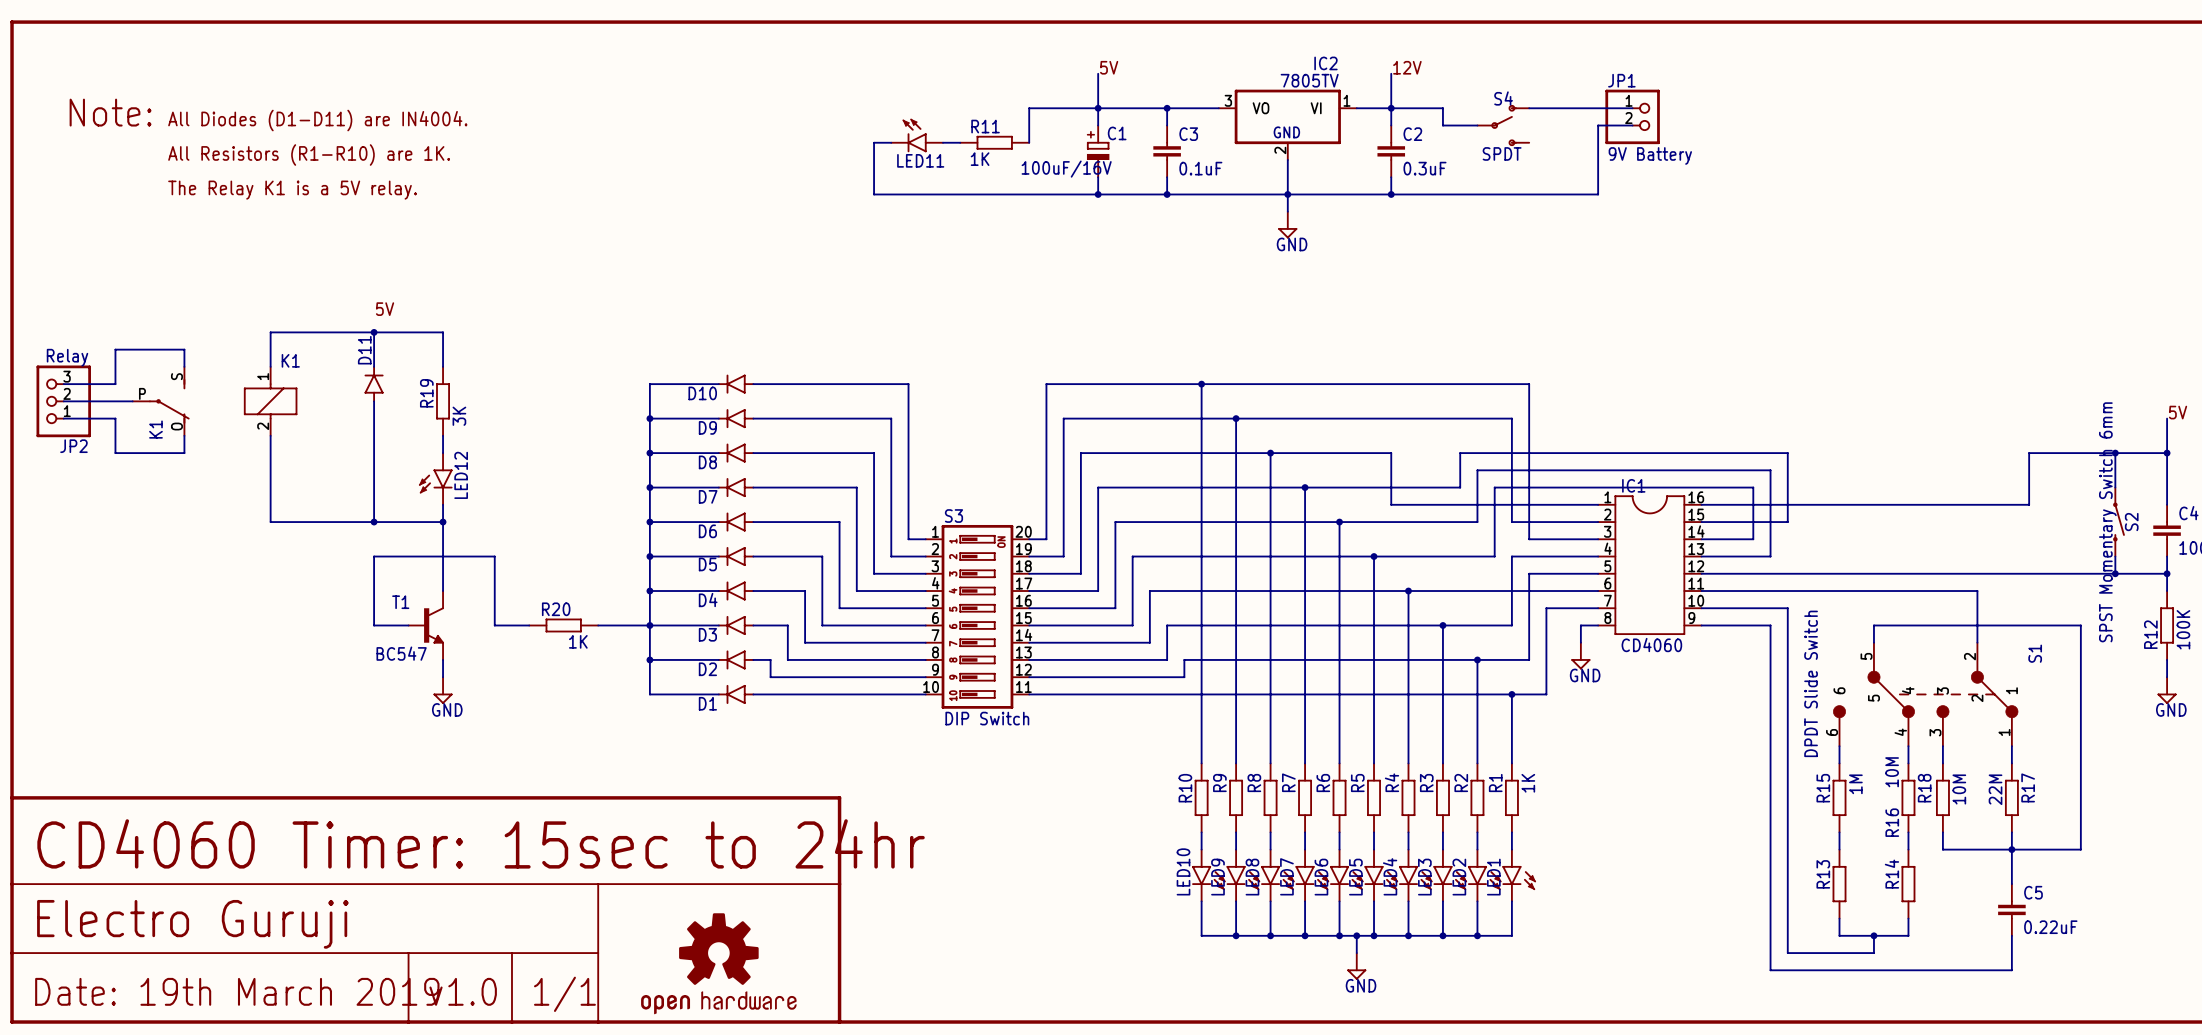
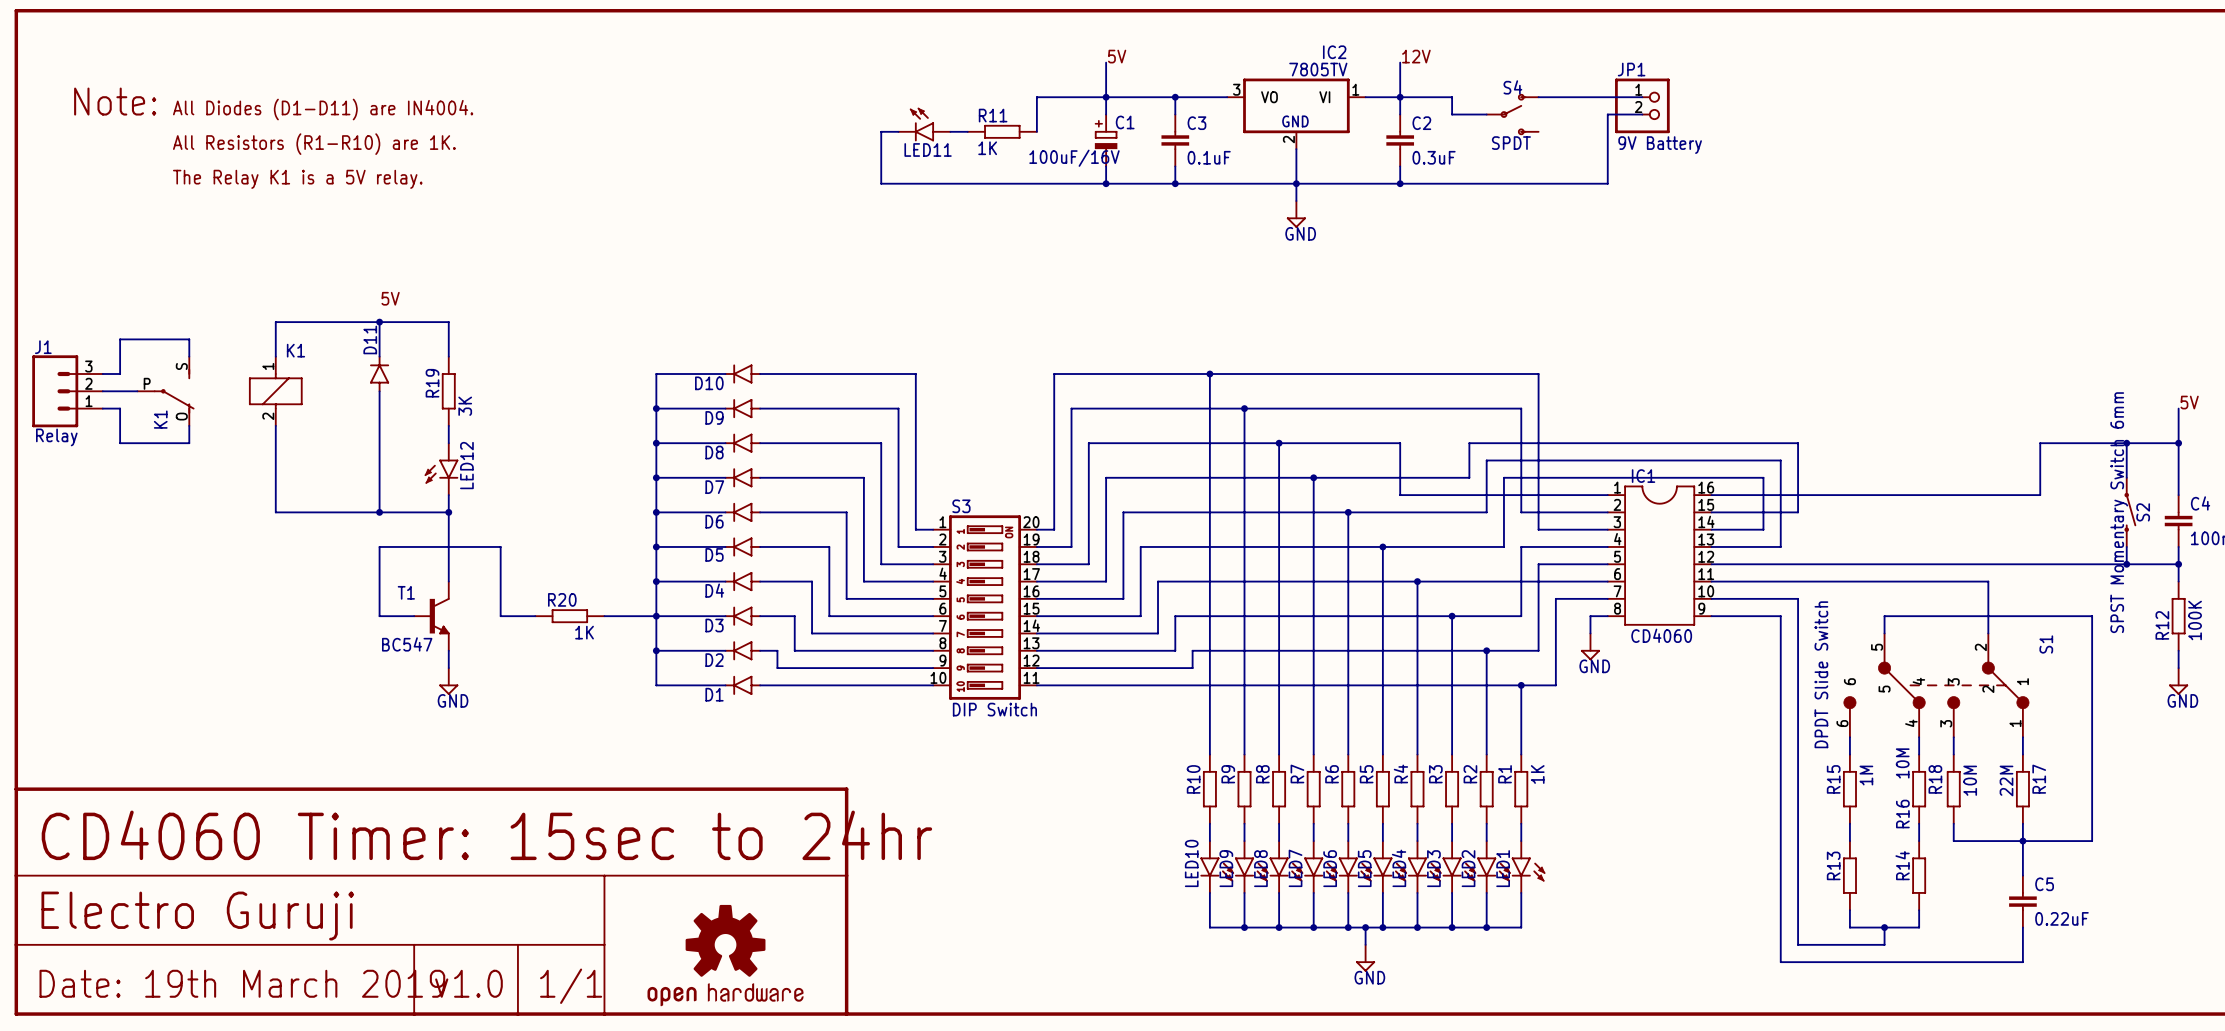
JP2: Relay (63, 401) -> none
J1: none -> Relay (67, 391)

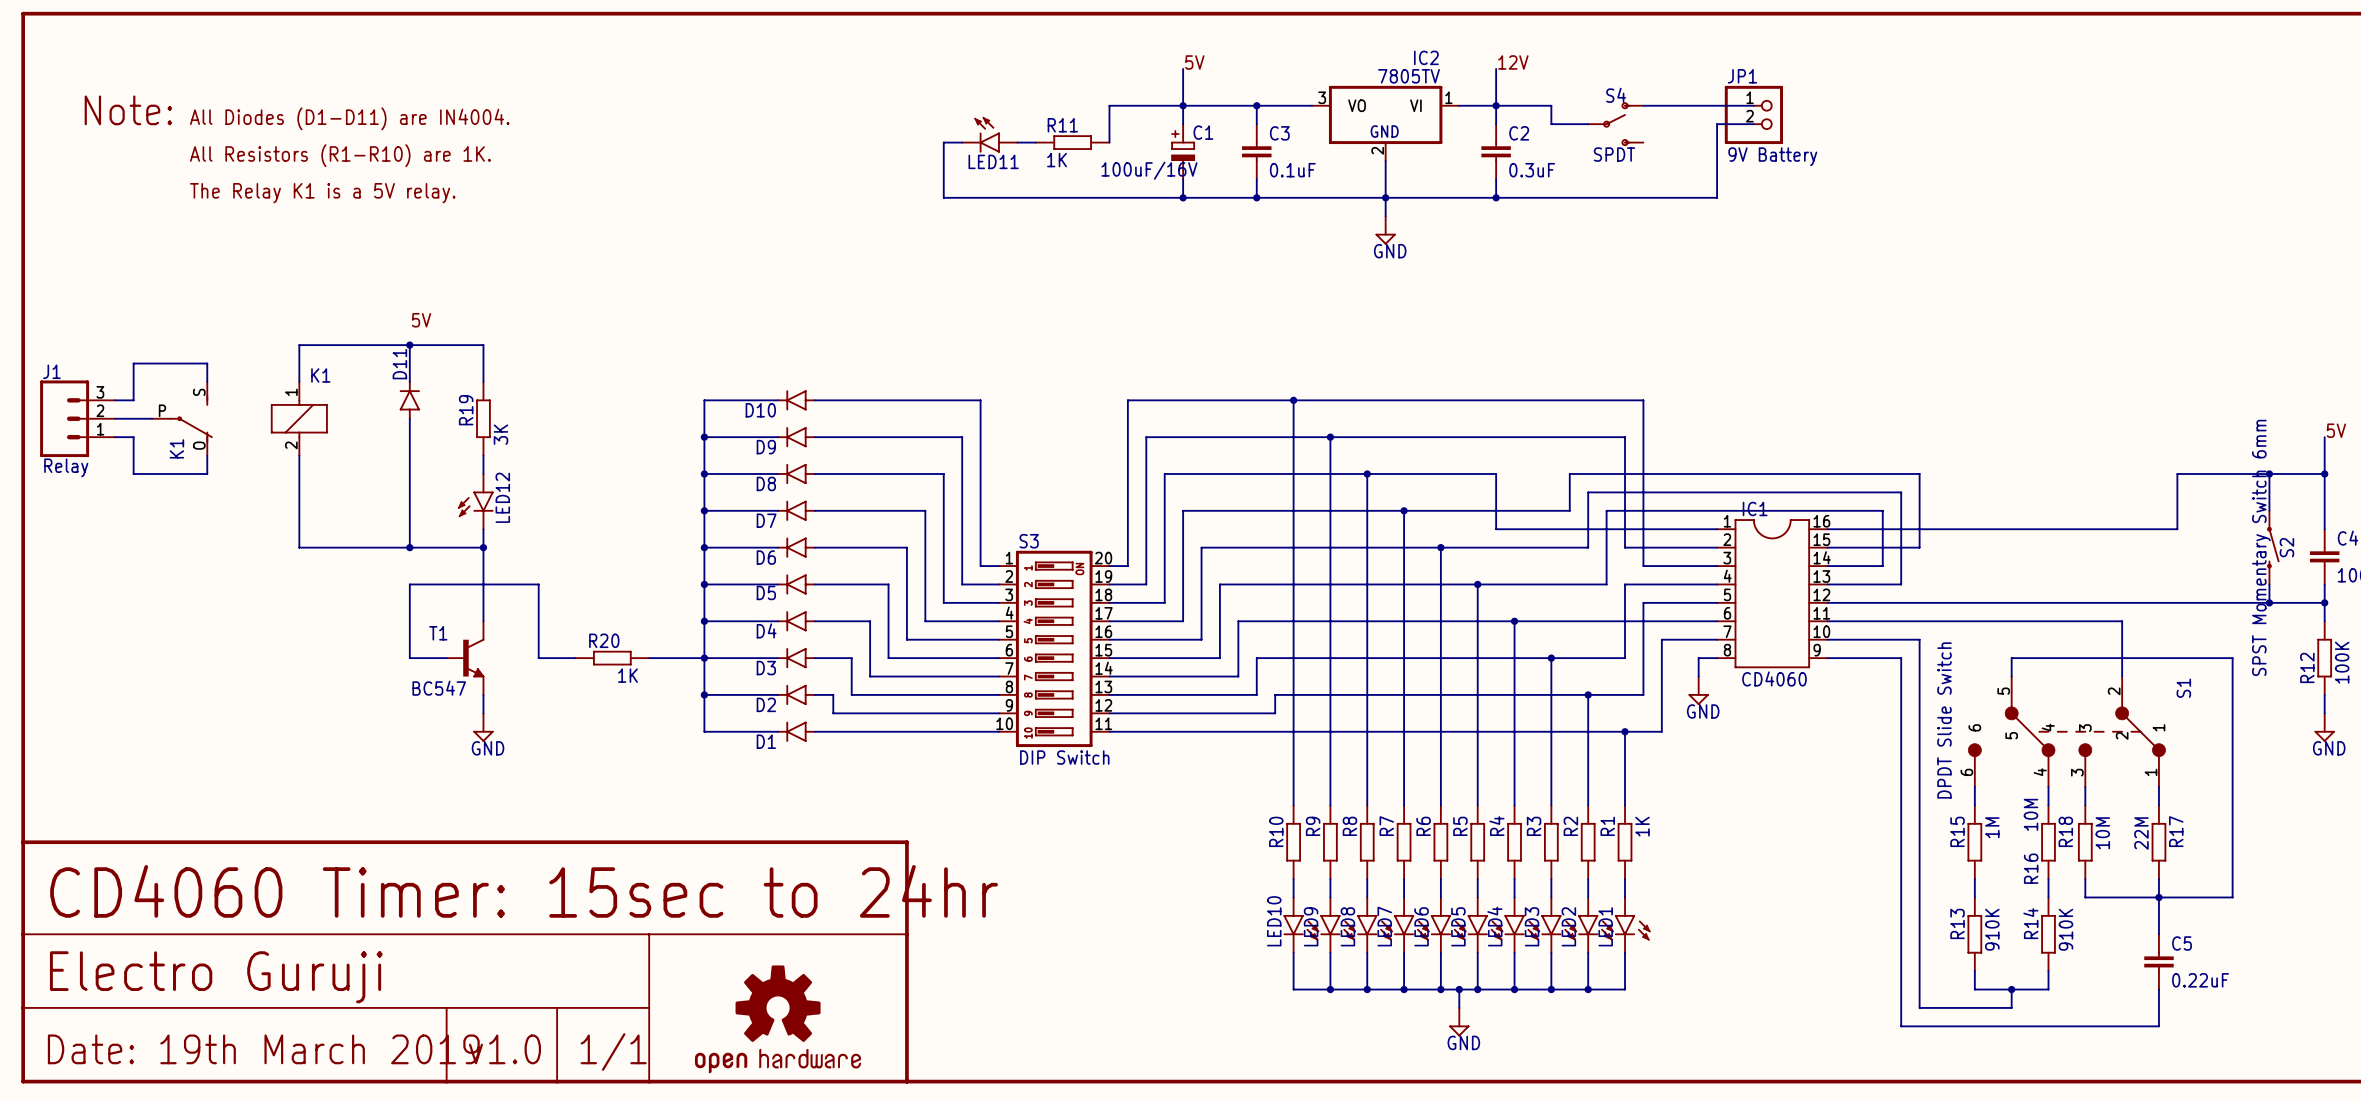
R13 value: none -> 910K (1992, 929)
R14 value: none -> 910K (2065, 929)

